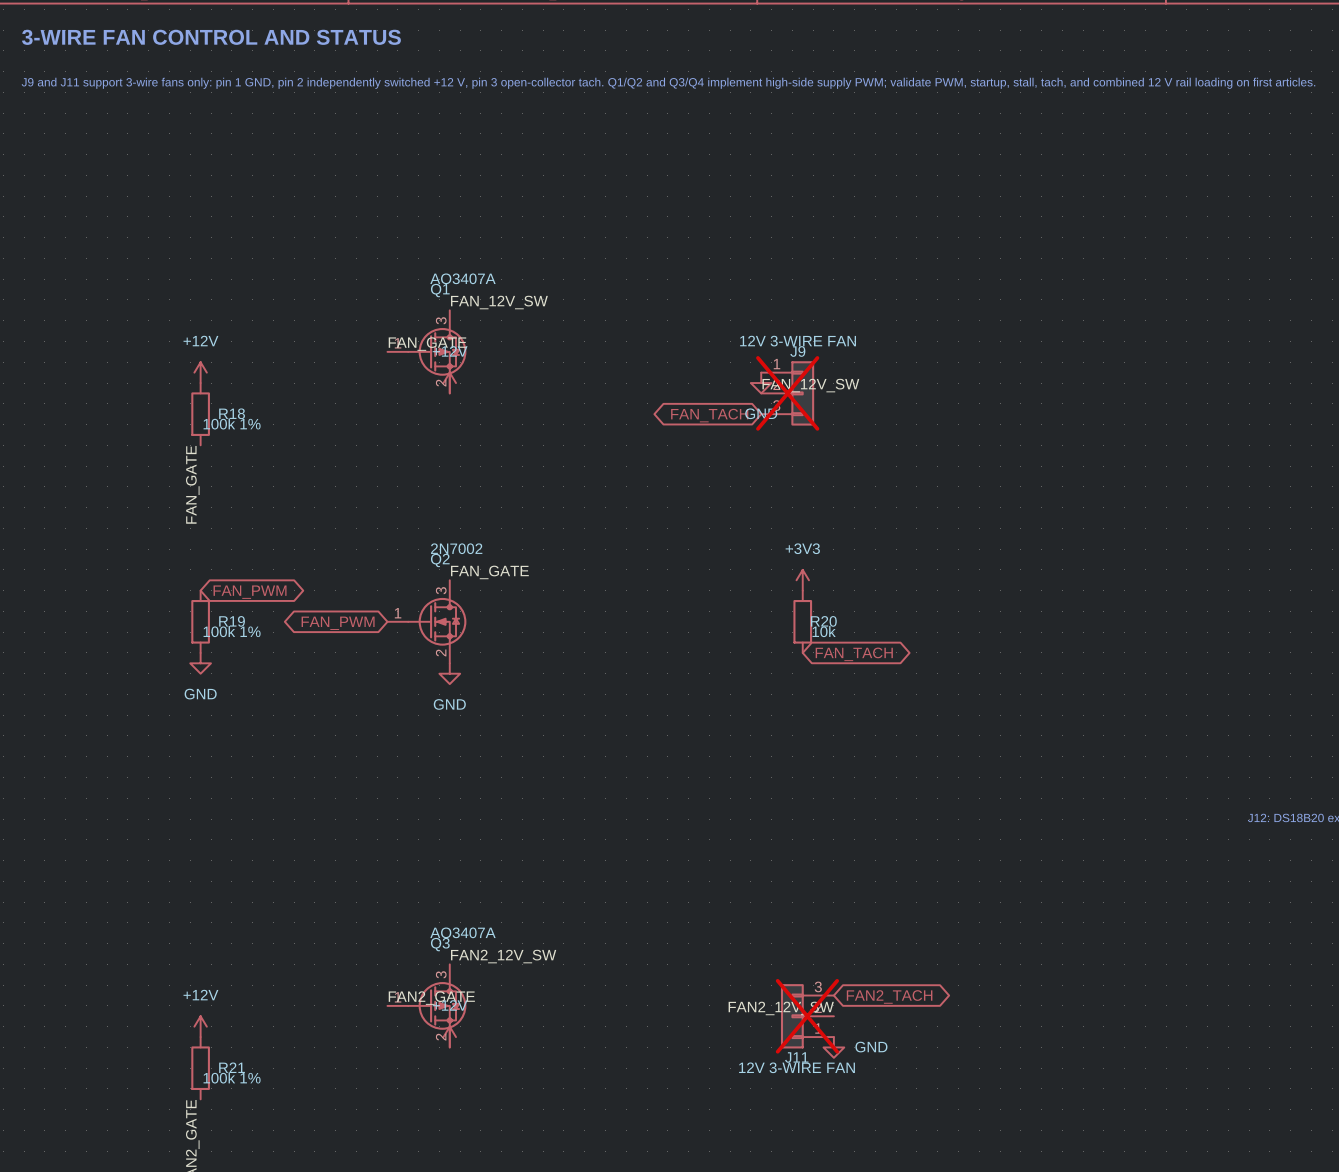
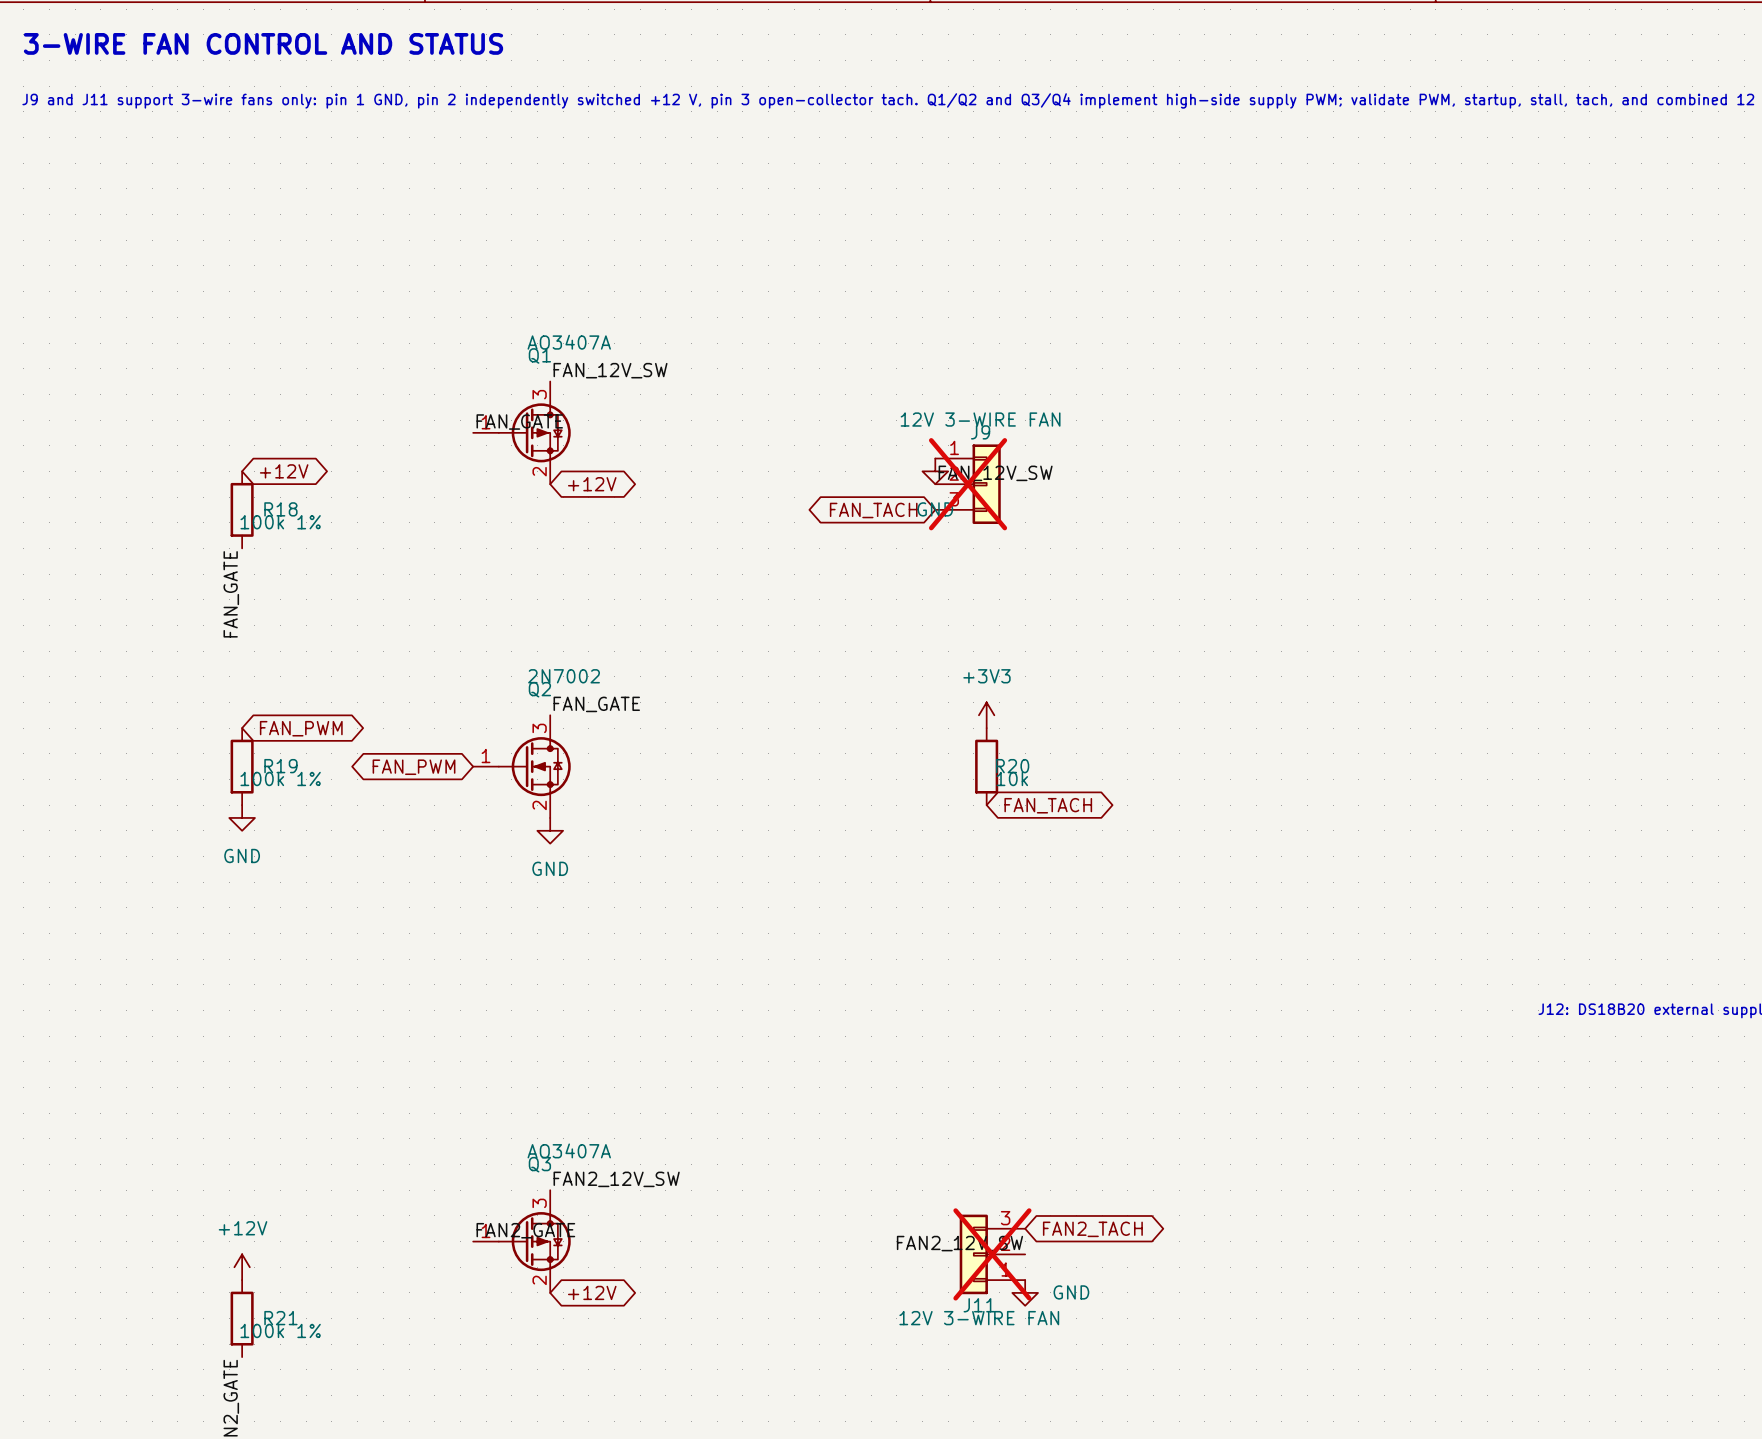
power symbol: +12V (200, 372) -> none
global label: none -> +12V (284, 471)
power symbol: +12V (449, 383) -> none
global label: none -> +12V (592, 484)
power symbol: +12V (449, 1037) -> none
global label: none -> +12V (592, 1292)

